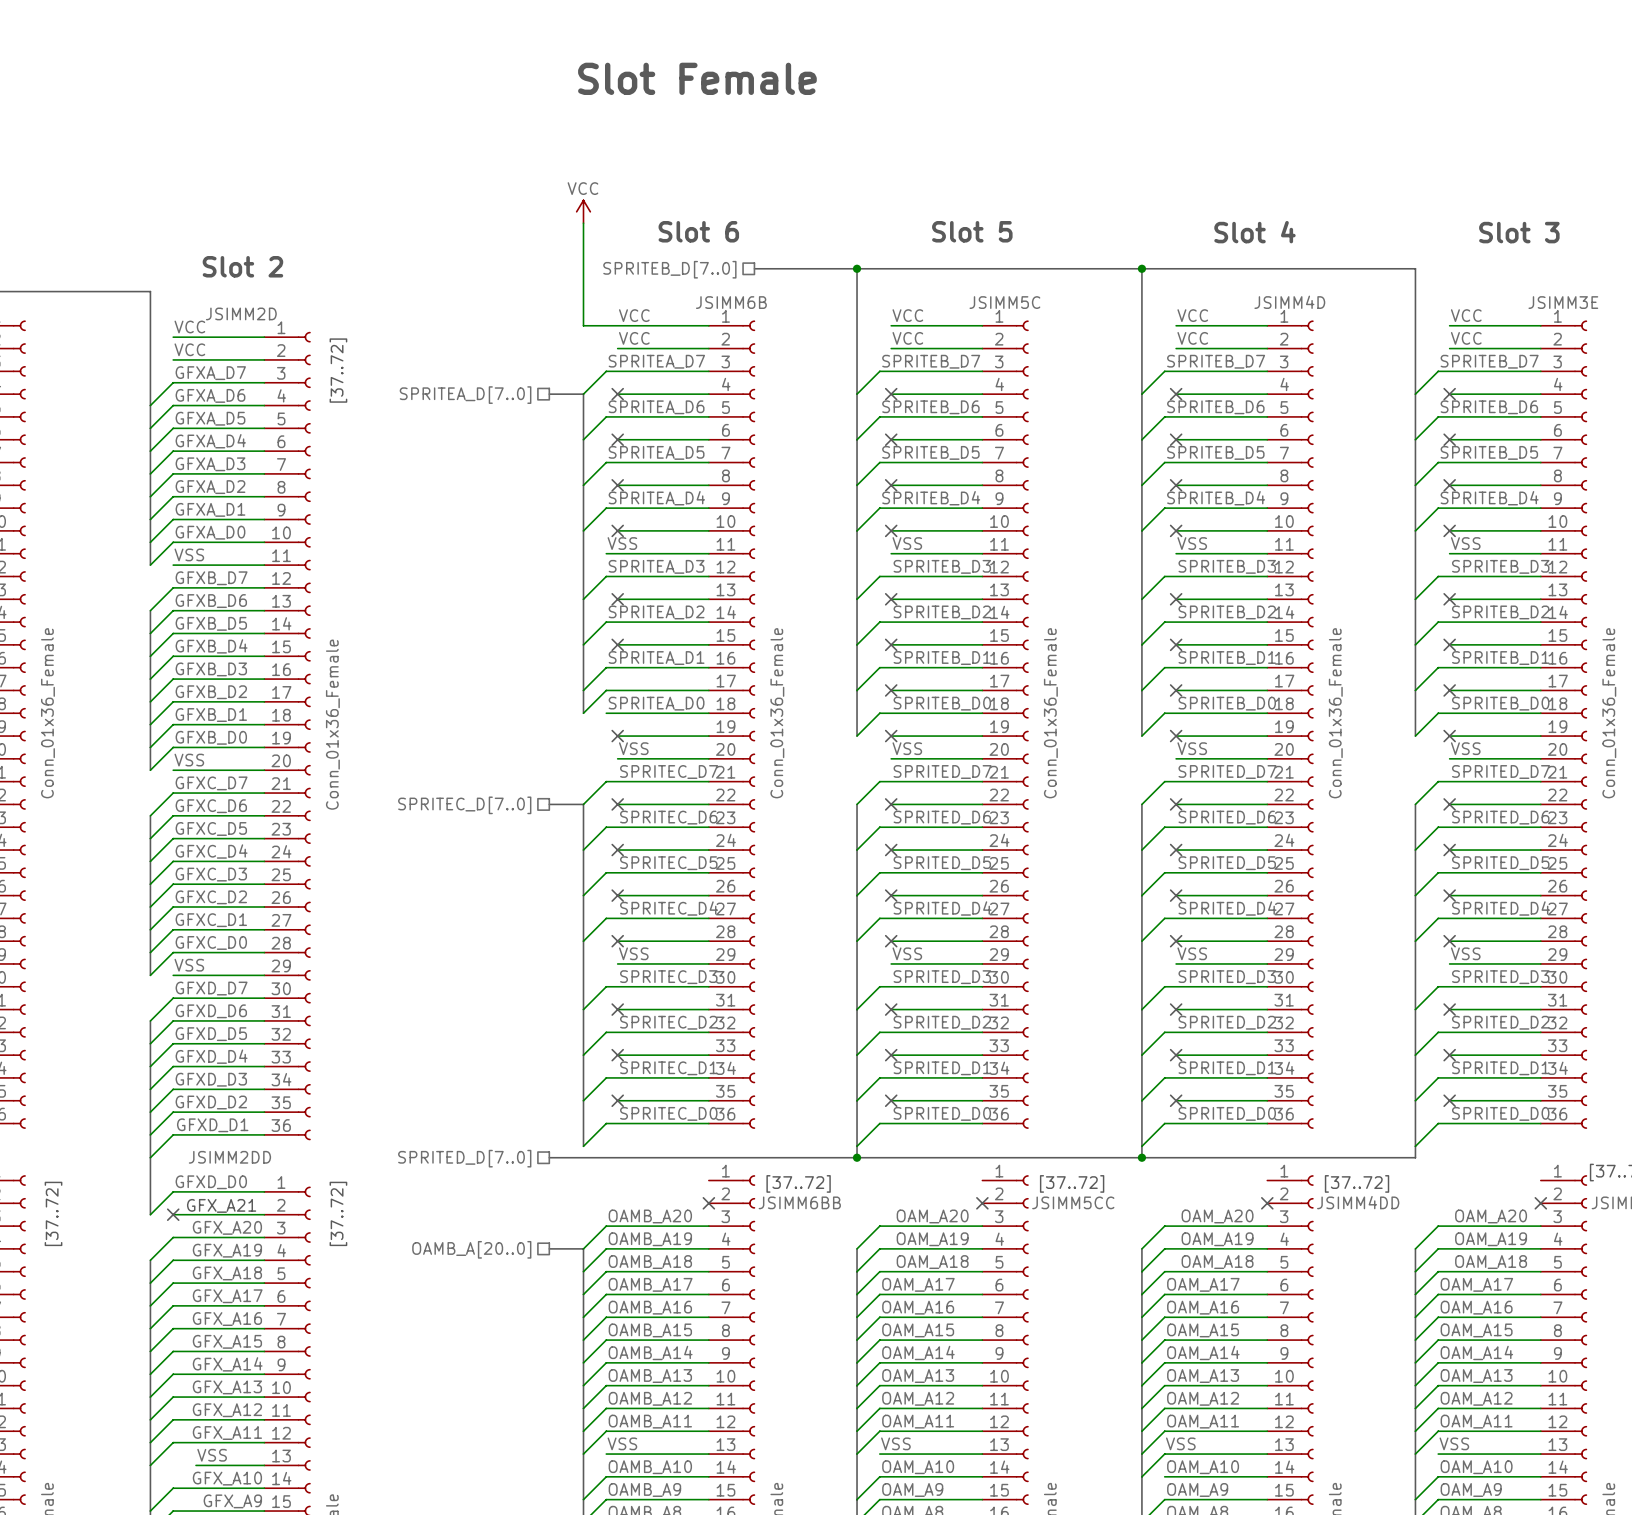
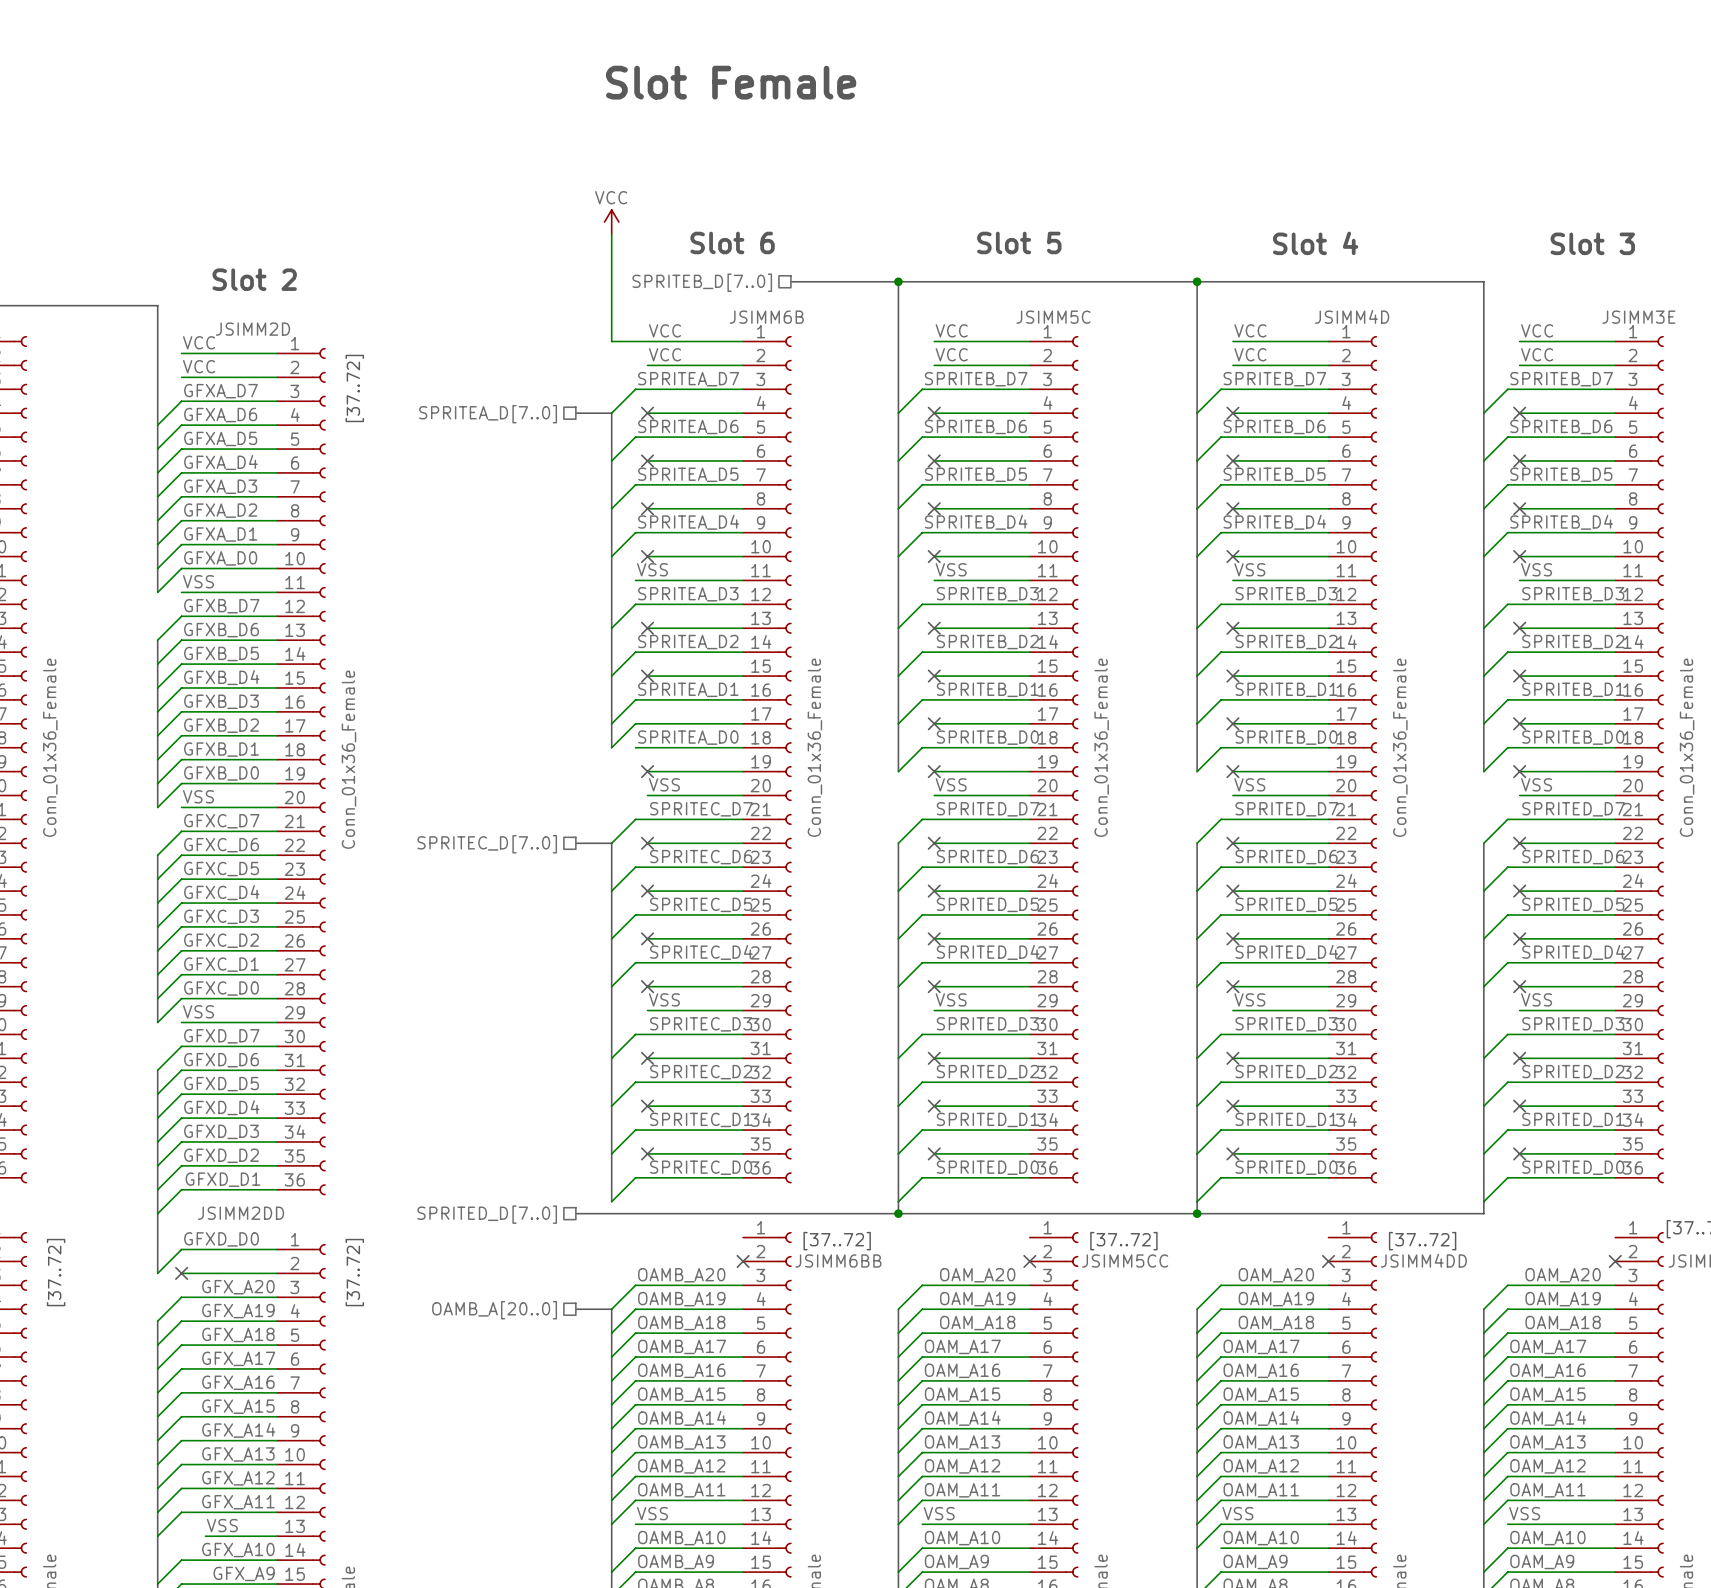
text: GFX_A21 (221, 1205) -> none

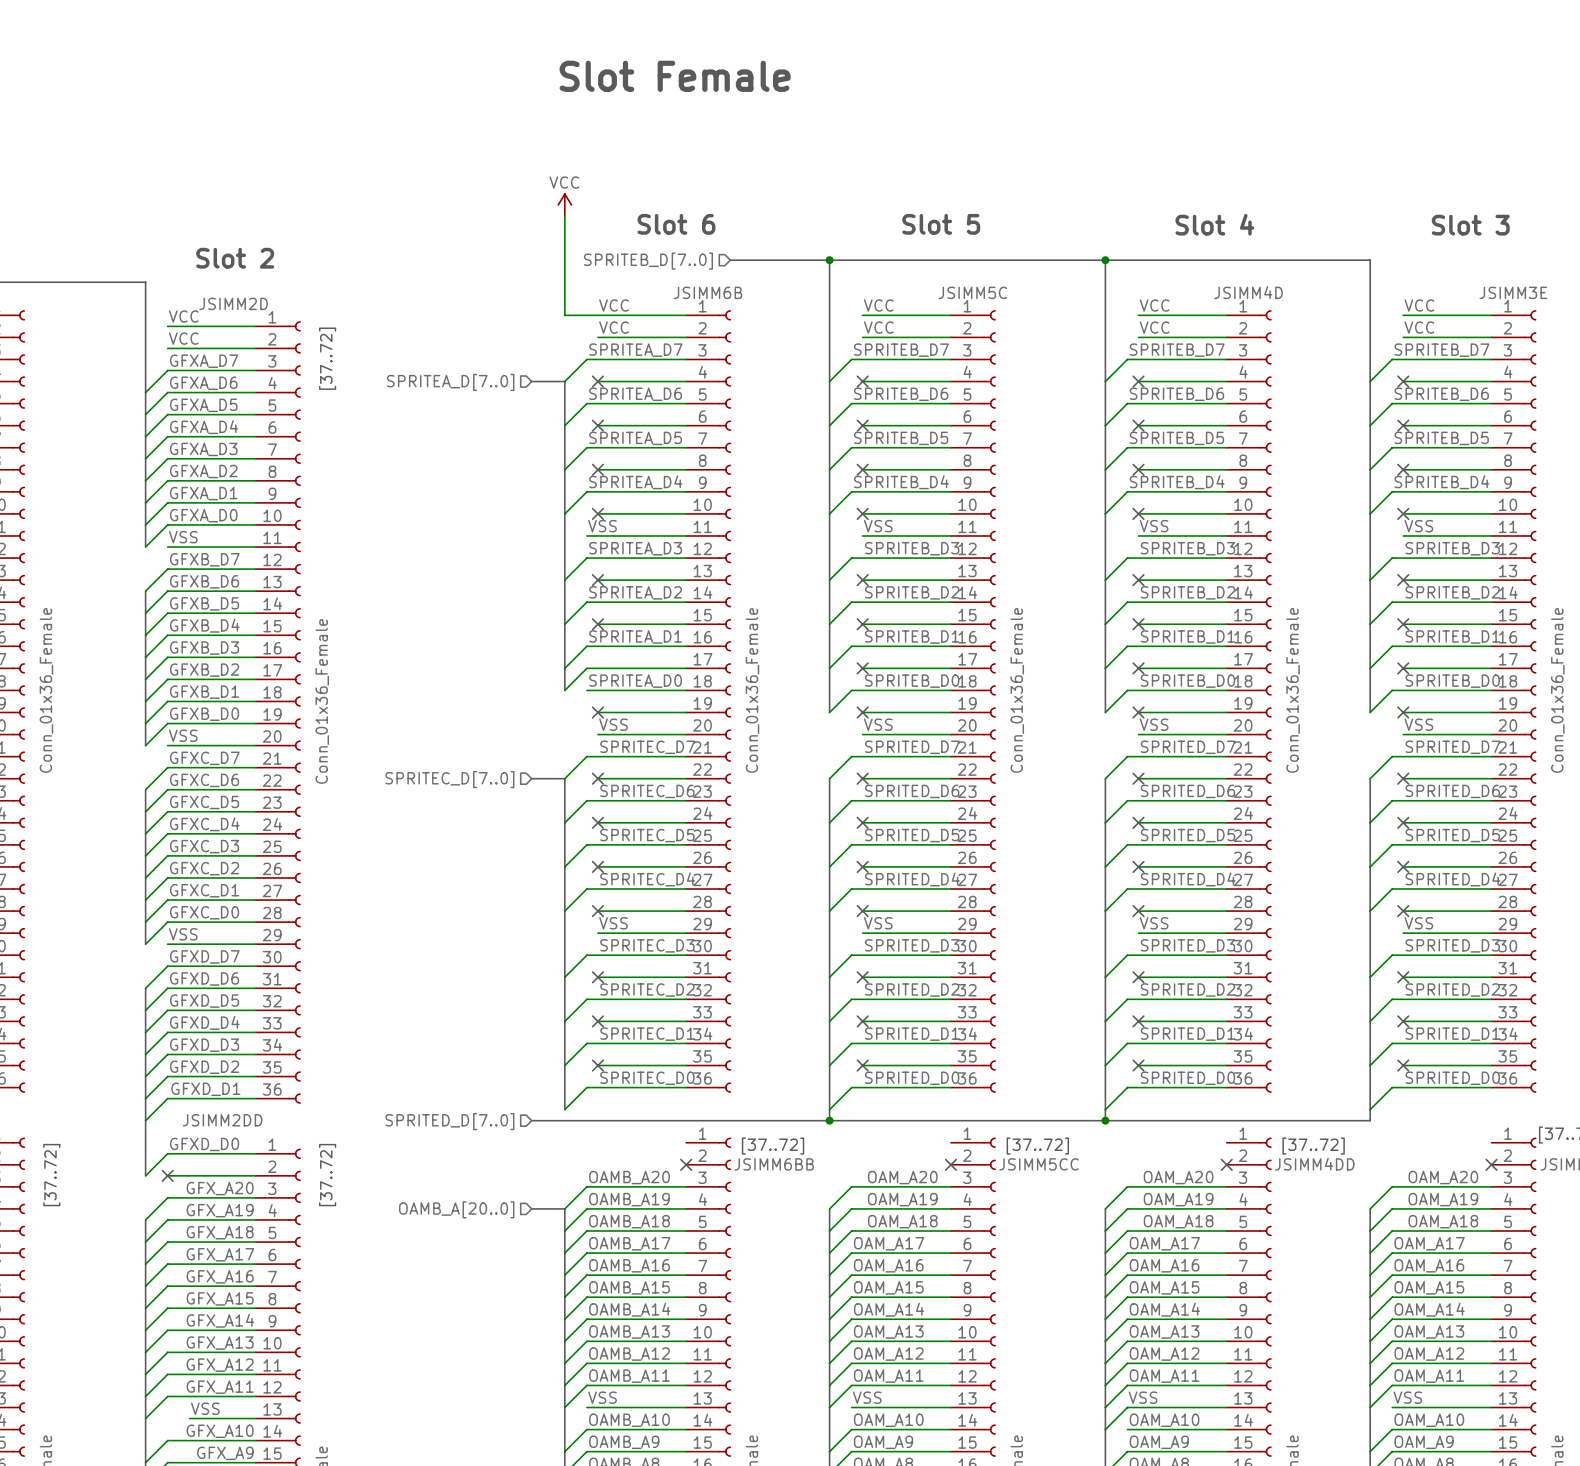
hierarchical label shape: passive (702, 282) -> input (648, 261)
hierarchical label shape: passive (488, 414) -> input (450, 382)
hierarchical label shape: passive (487, 844) -> input (449, 779)
hierarchical label shape: passive (487, 1214) -> input (449, 1121)
hierarchical label shape: passive (494, 1310) -> input (456, 1209)

